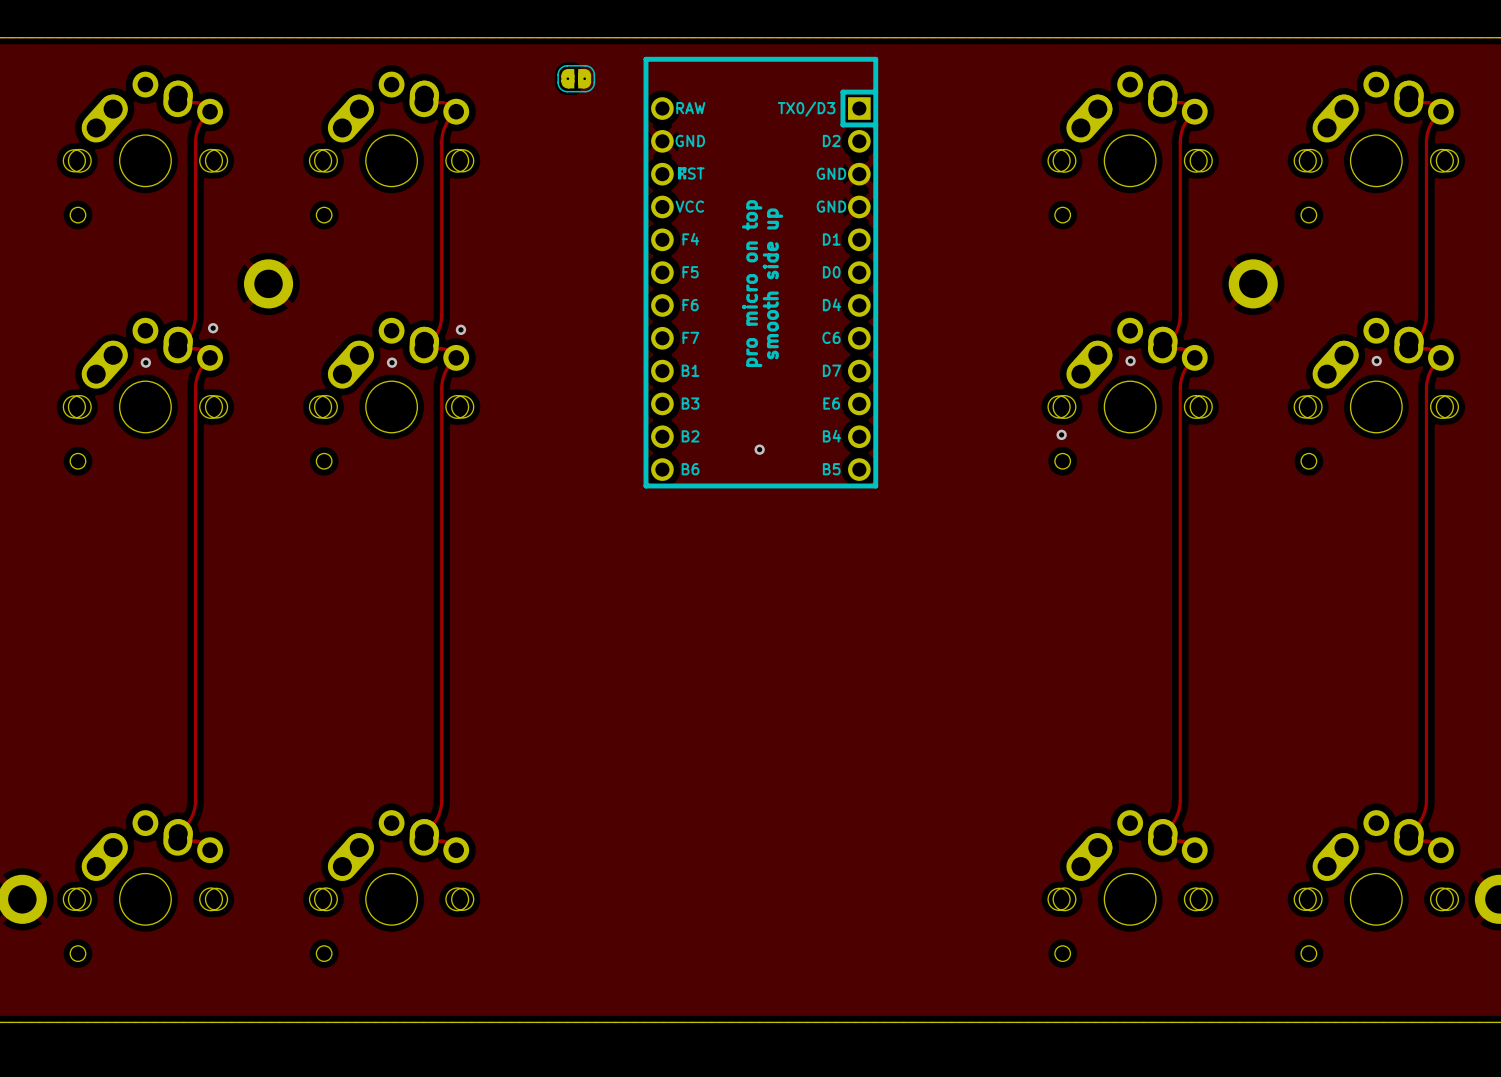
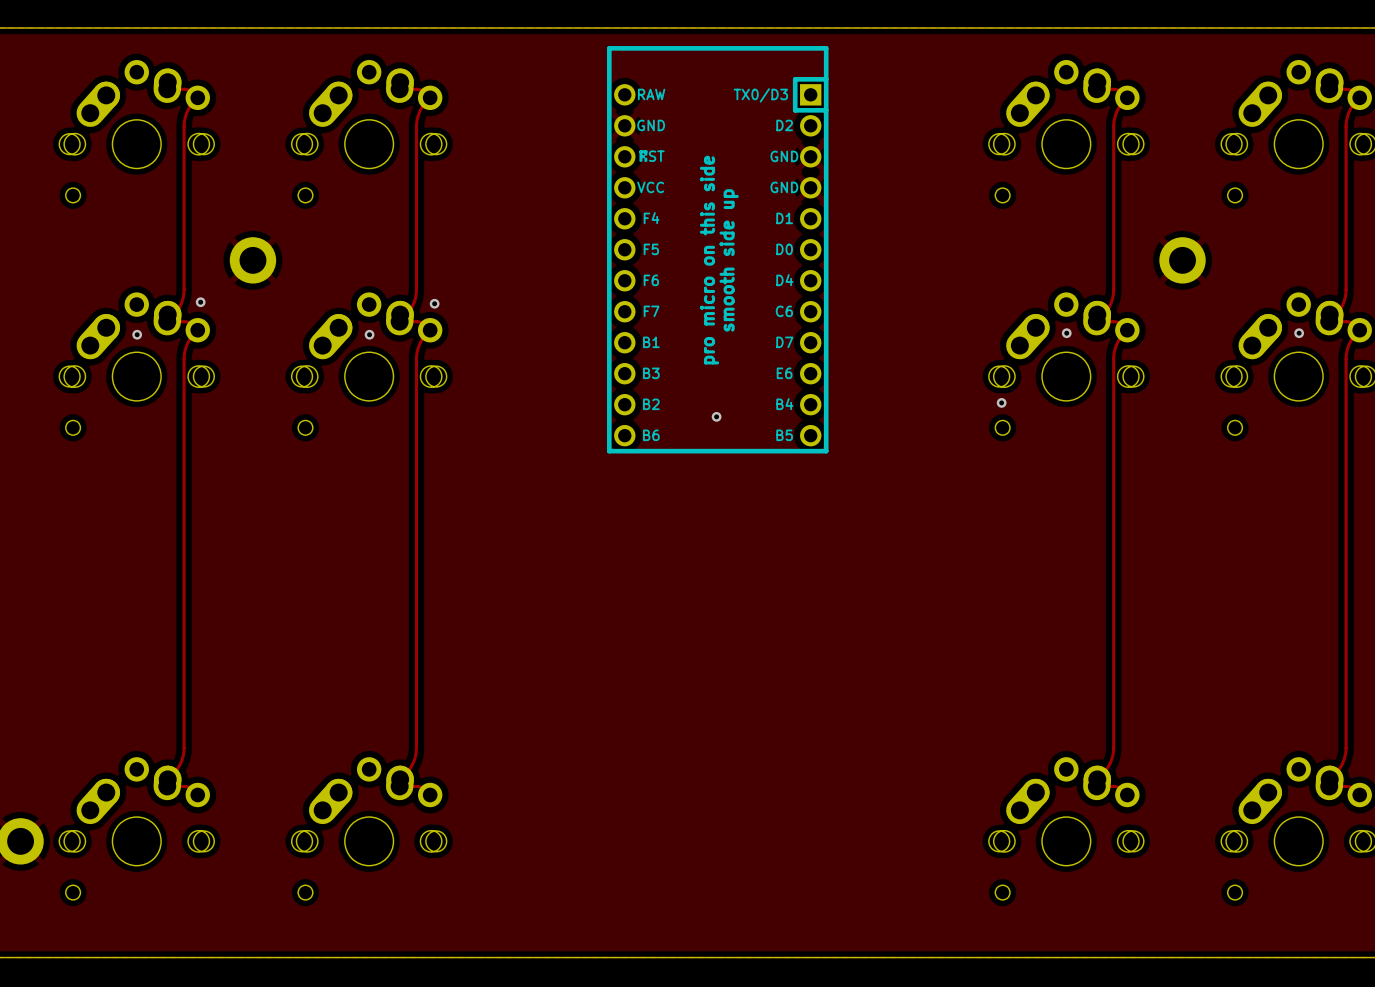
part: (576, 78) -> none
text: pro micro on top (752, 283) -> pro micro on this side (709, 260)

